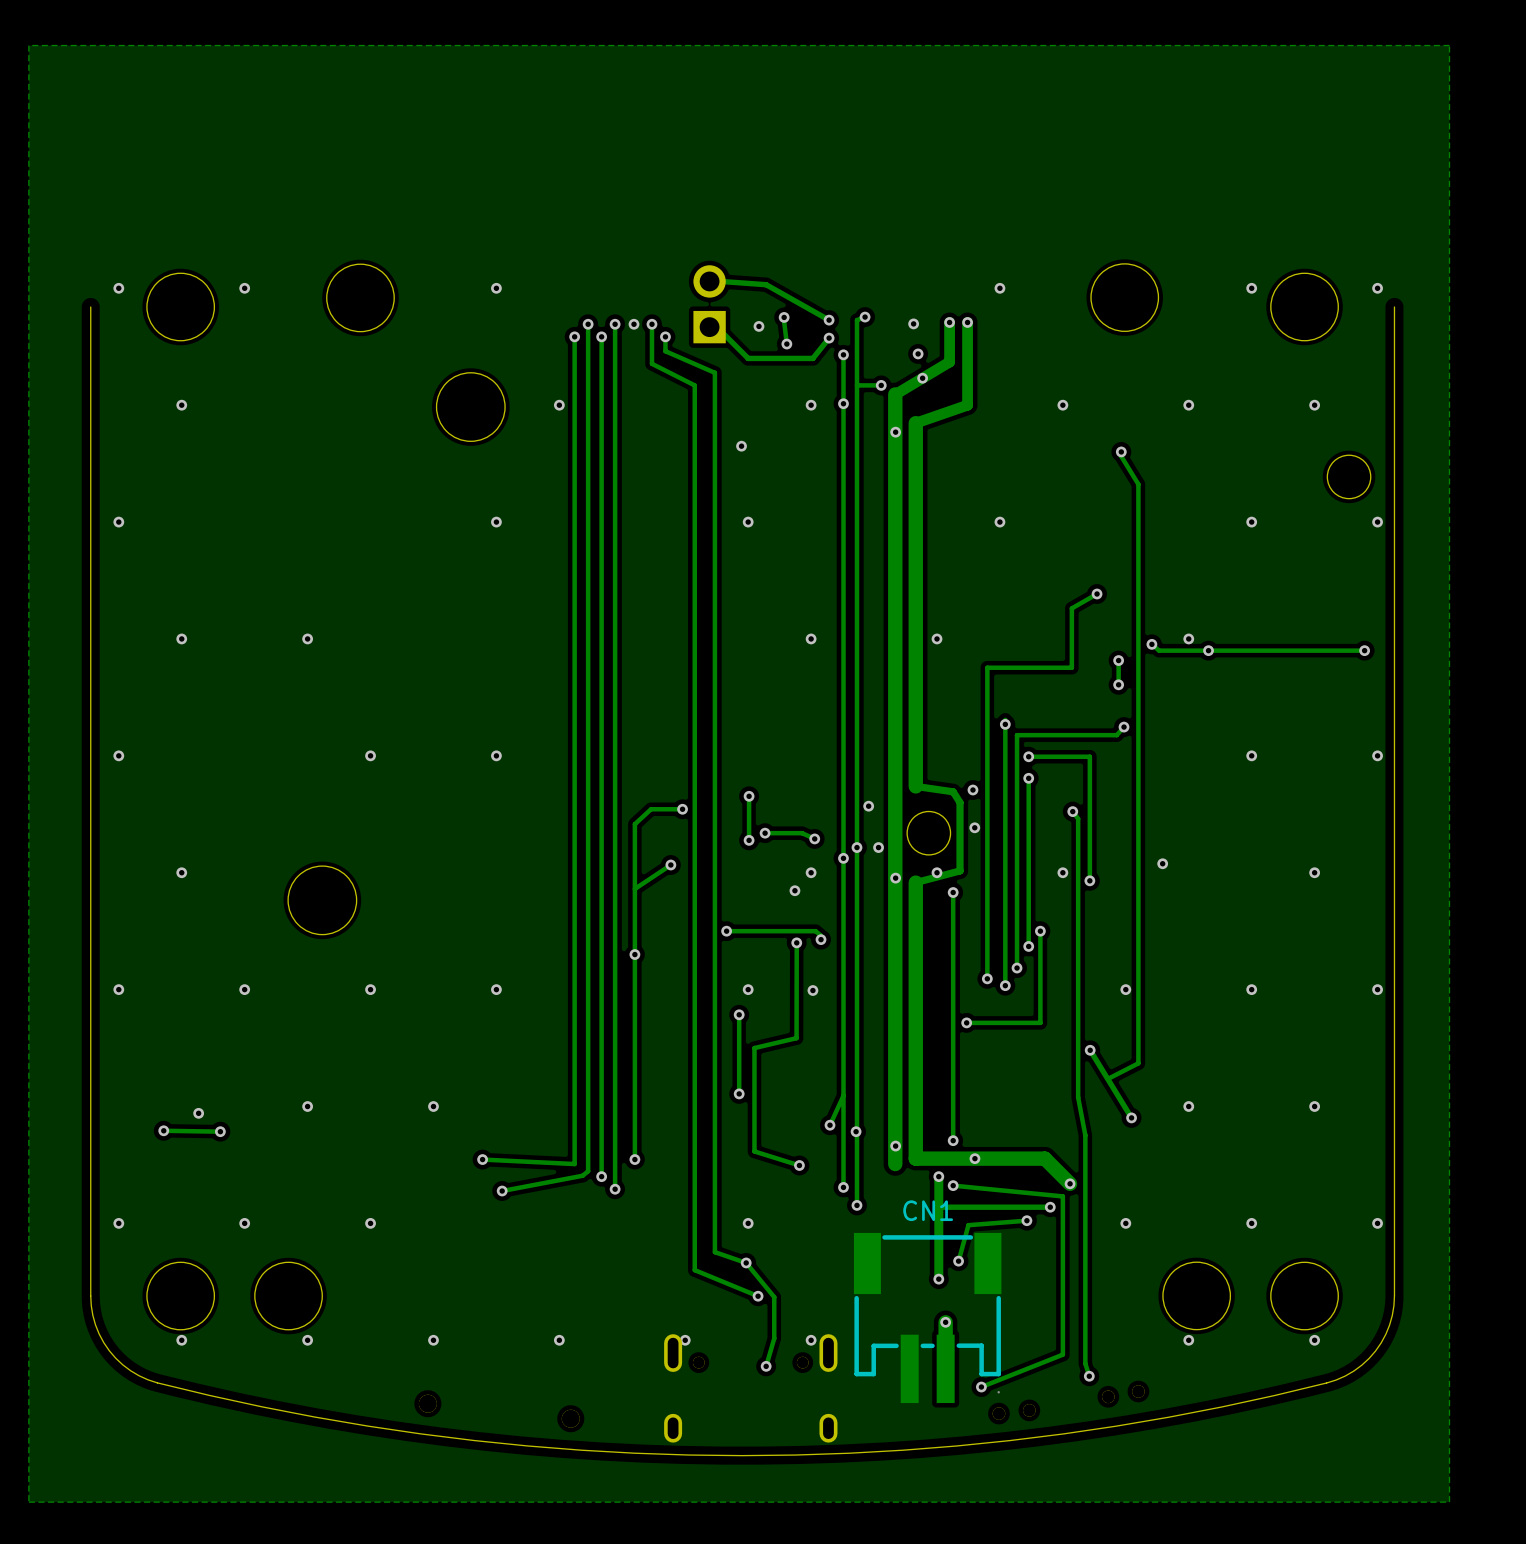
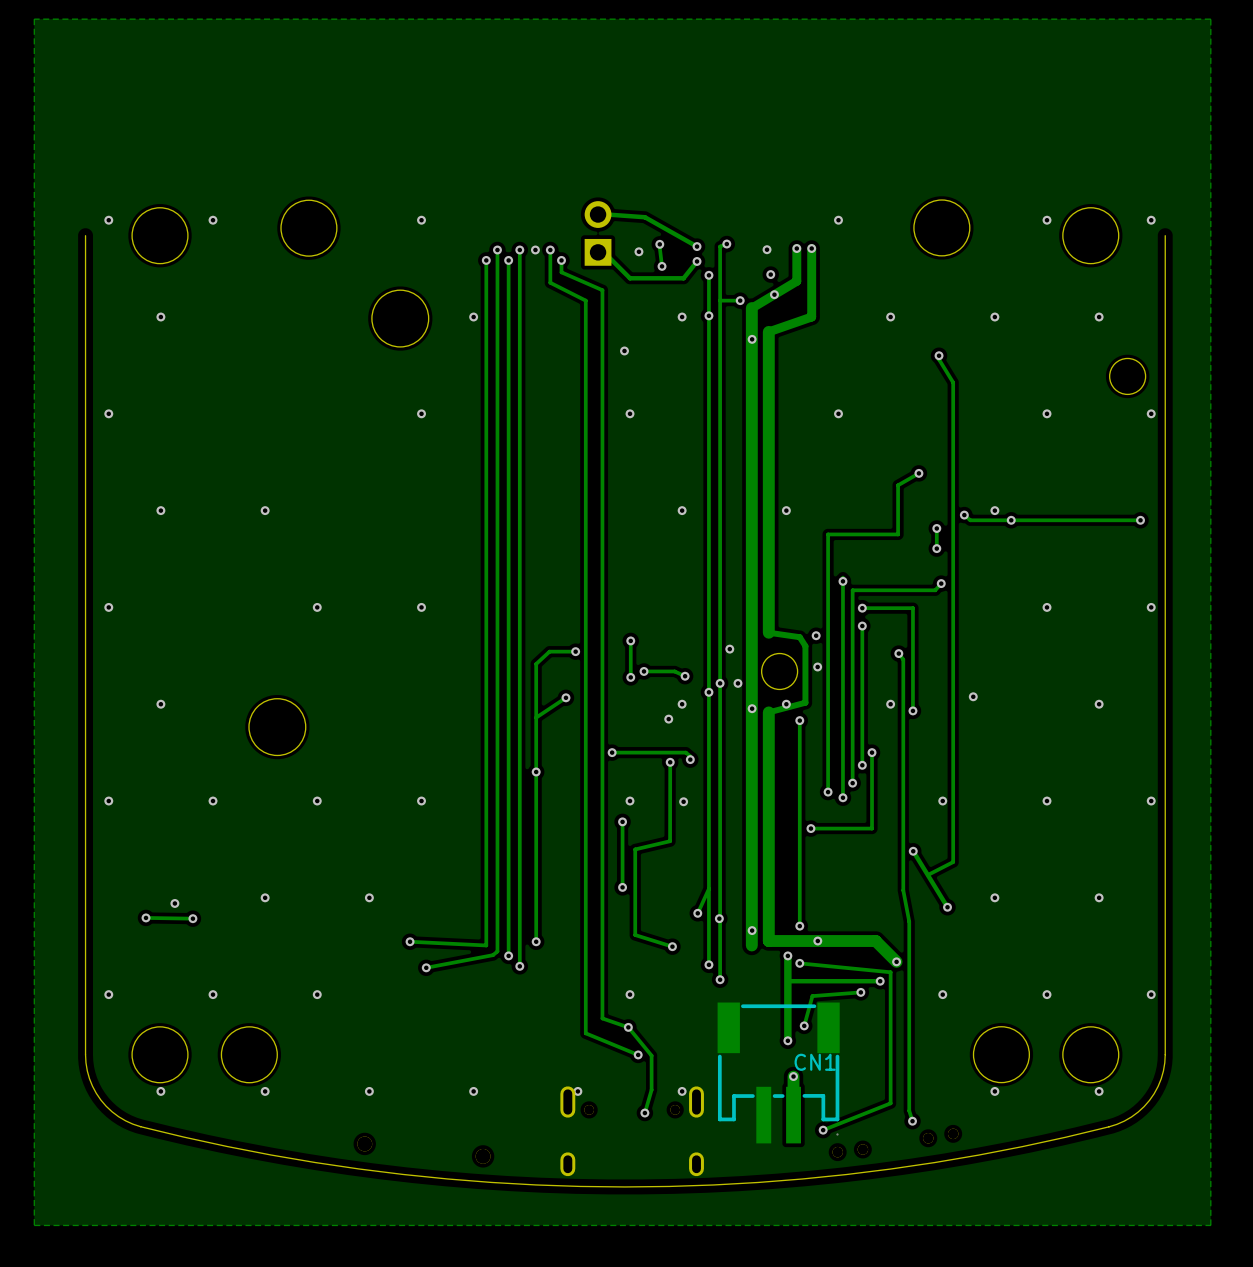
CN1 name position: CN1 (928, 1210) -> CN1 (815, 1062)

